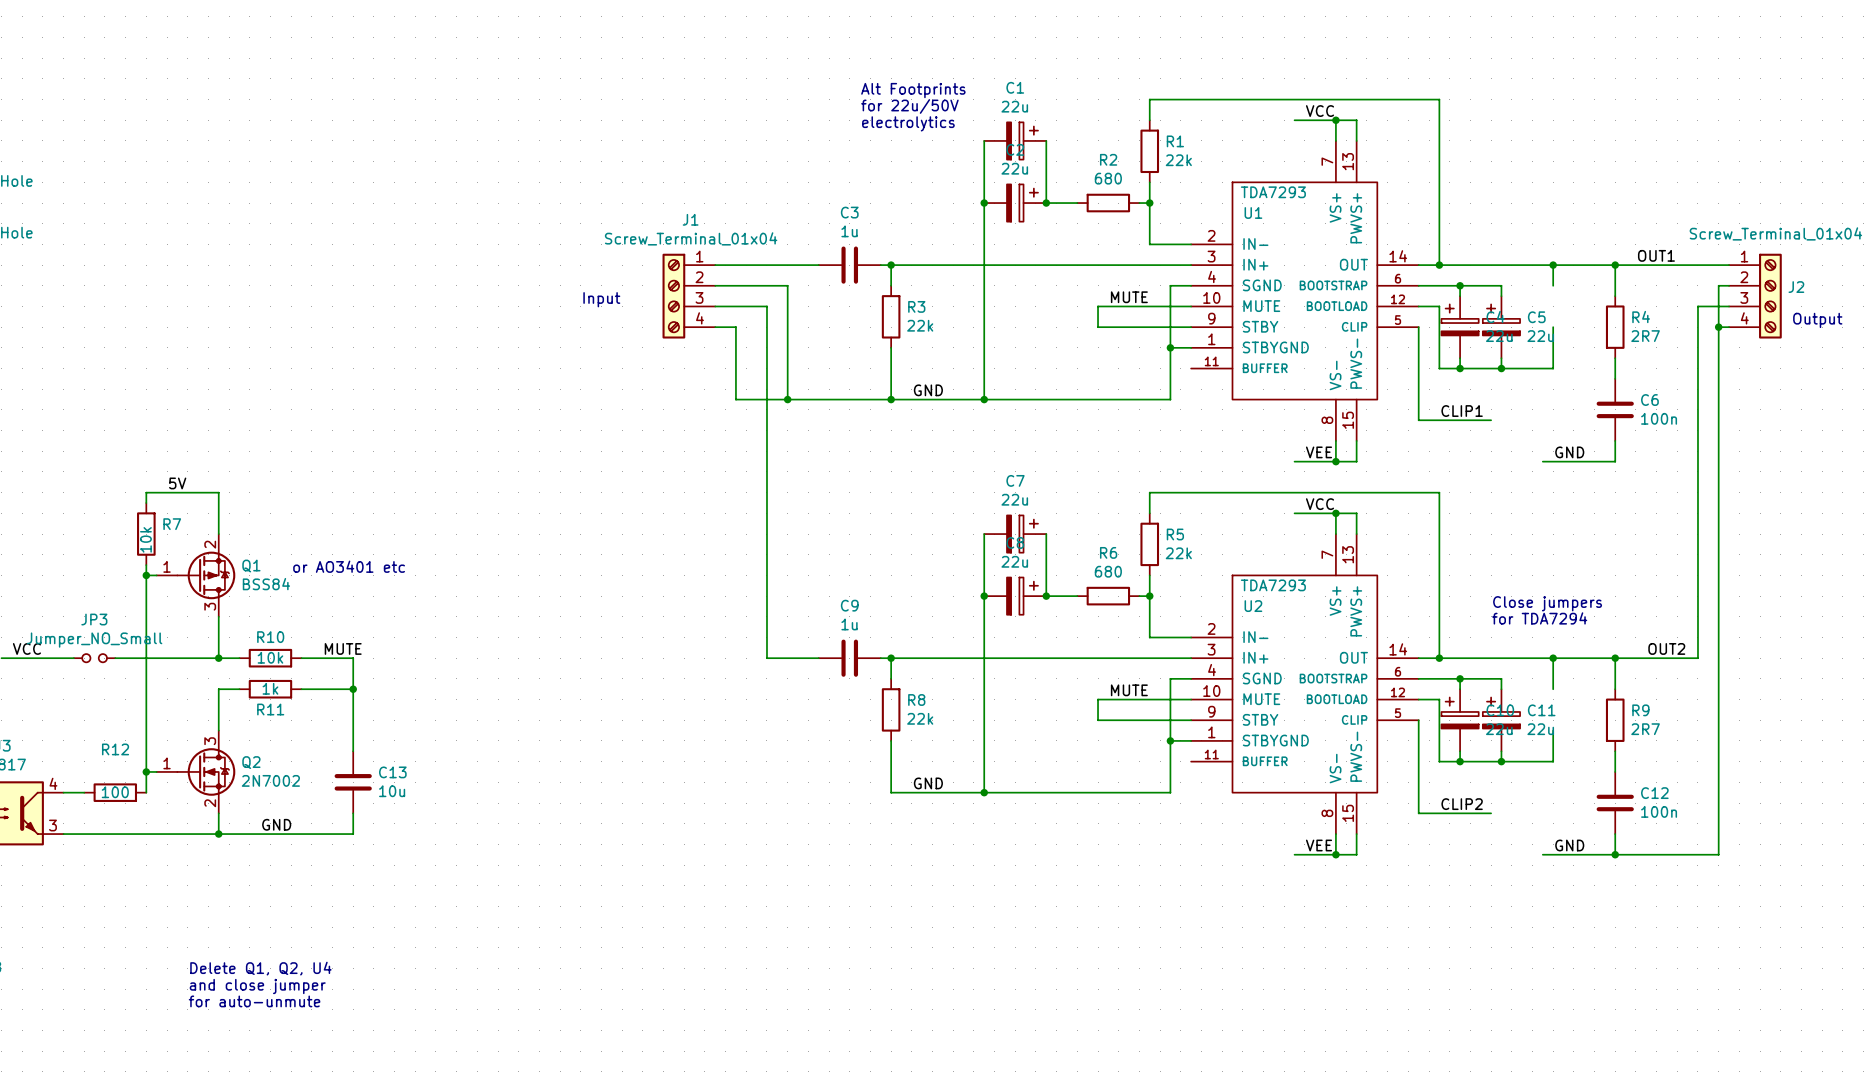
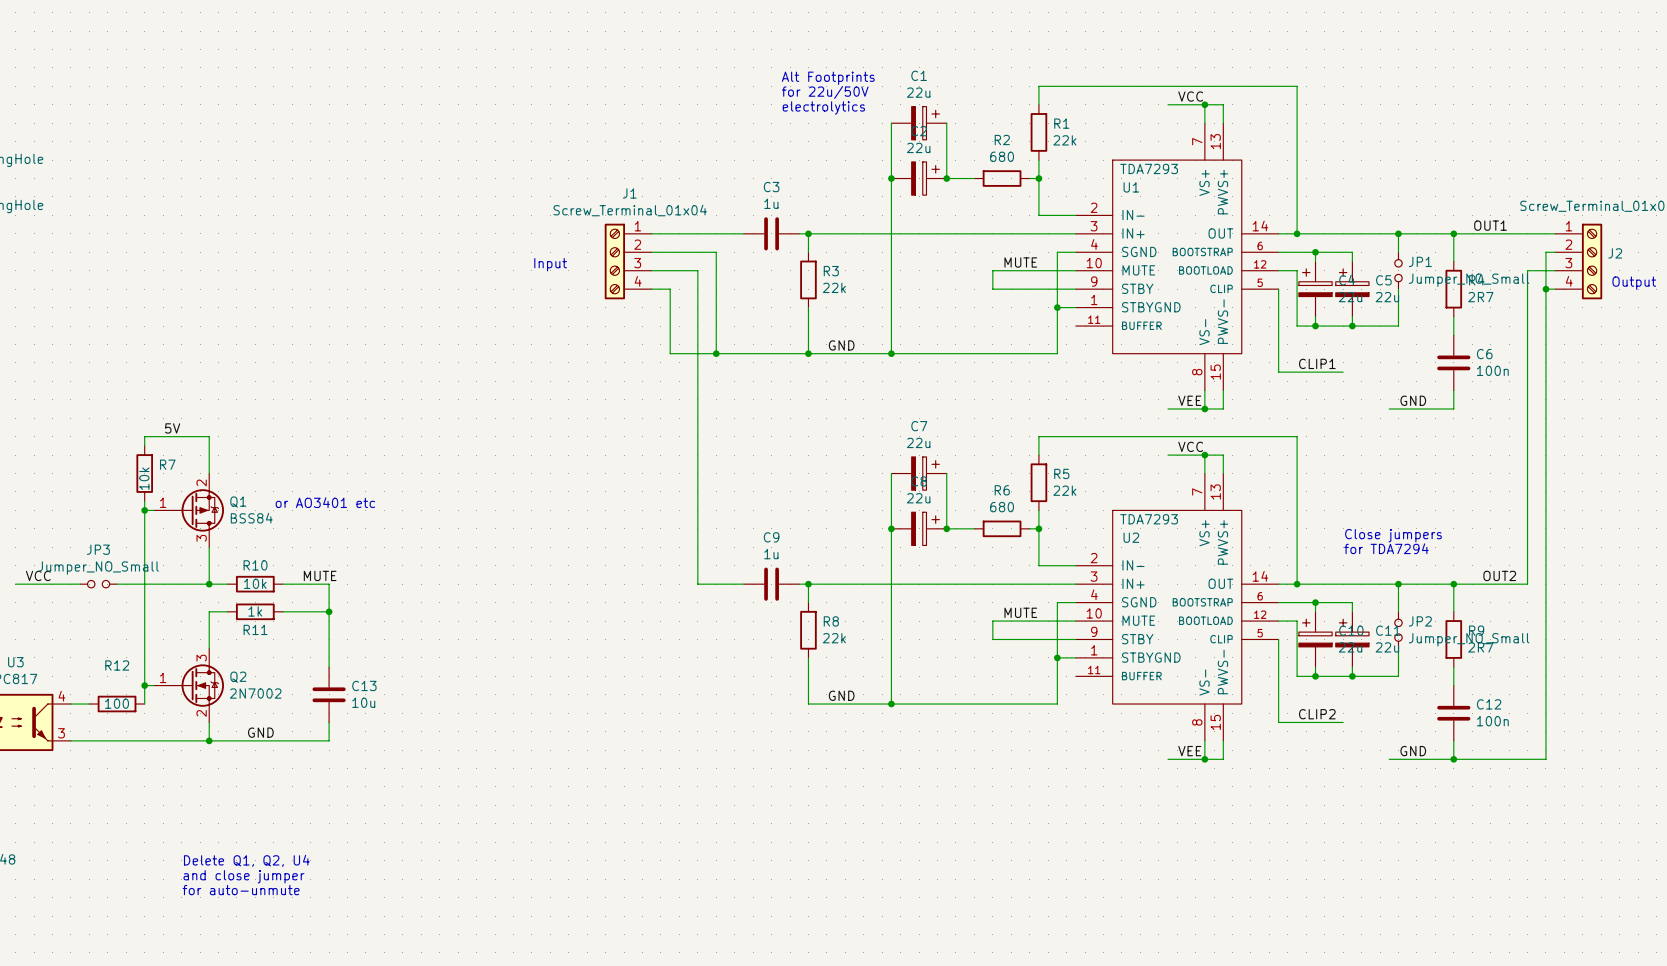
JP1: none -> Jumper_NO_Small (1398, 270)
JP2: none -> Jumper_NO_Small (1398, 630)

